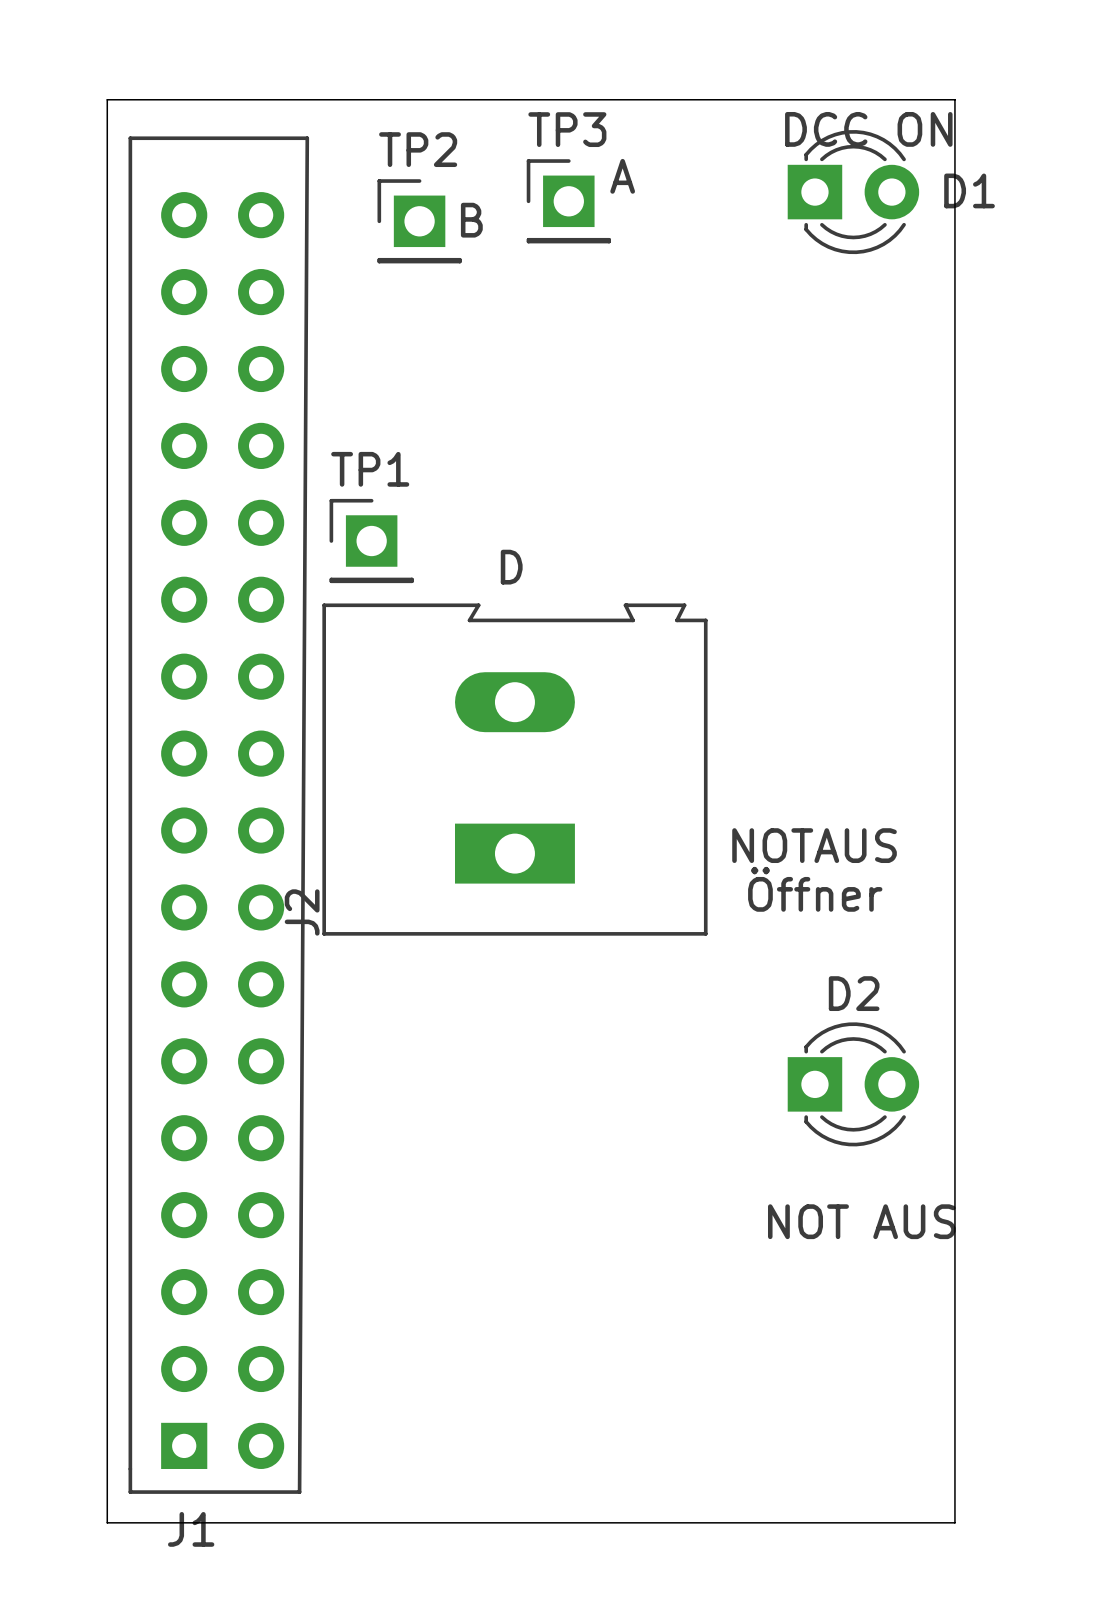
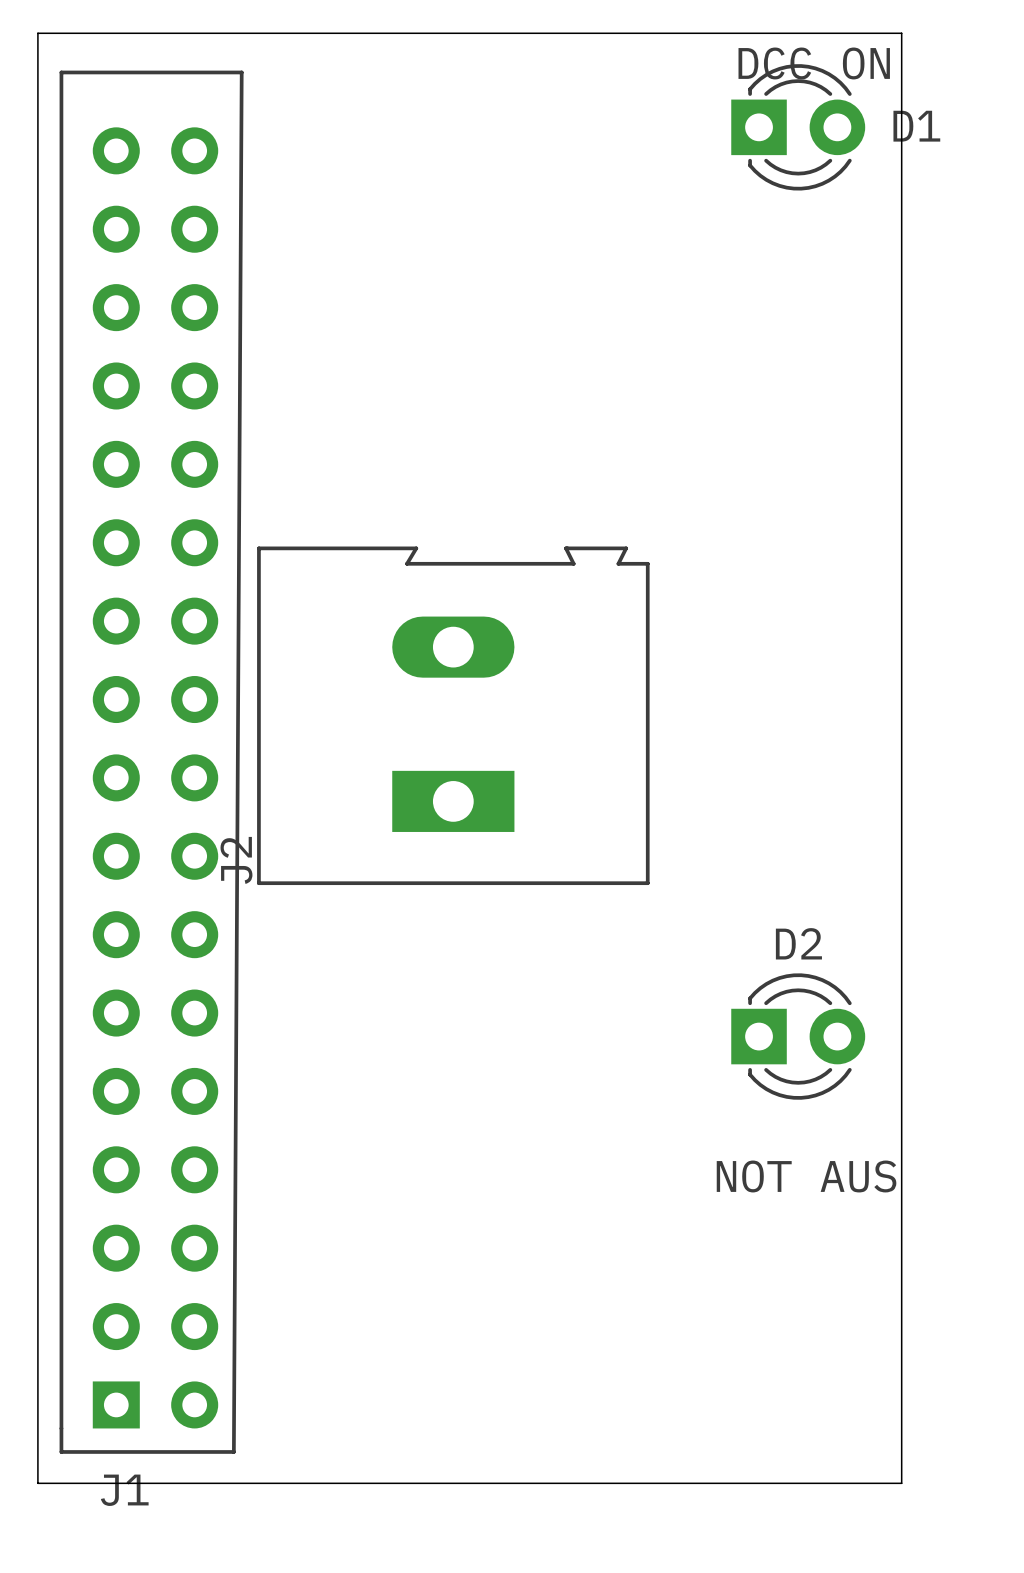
text: A (622, 176) -> none
TP3: (568, 201) -> none
text: B (471, 220) -> none
TP2: (419, 221) -> none
TP1: (371, 541) -> none
text: D (511, 567) -> none
text: NOTAUS (814, 845) -> none
text: Öffner (815, 889) -> none

